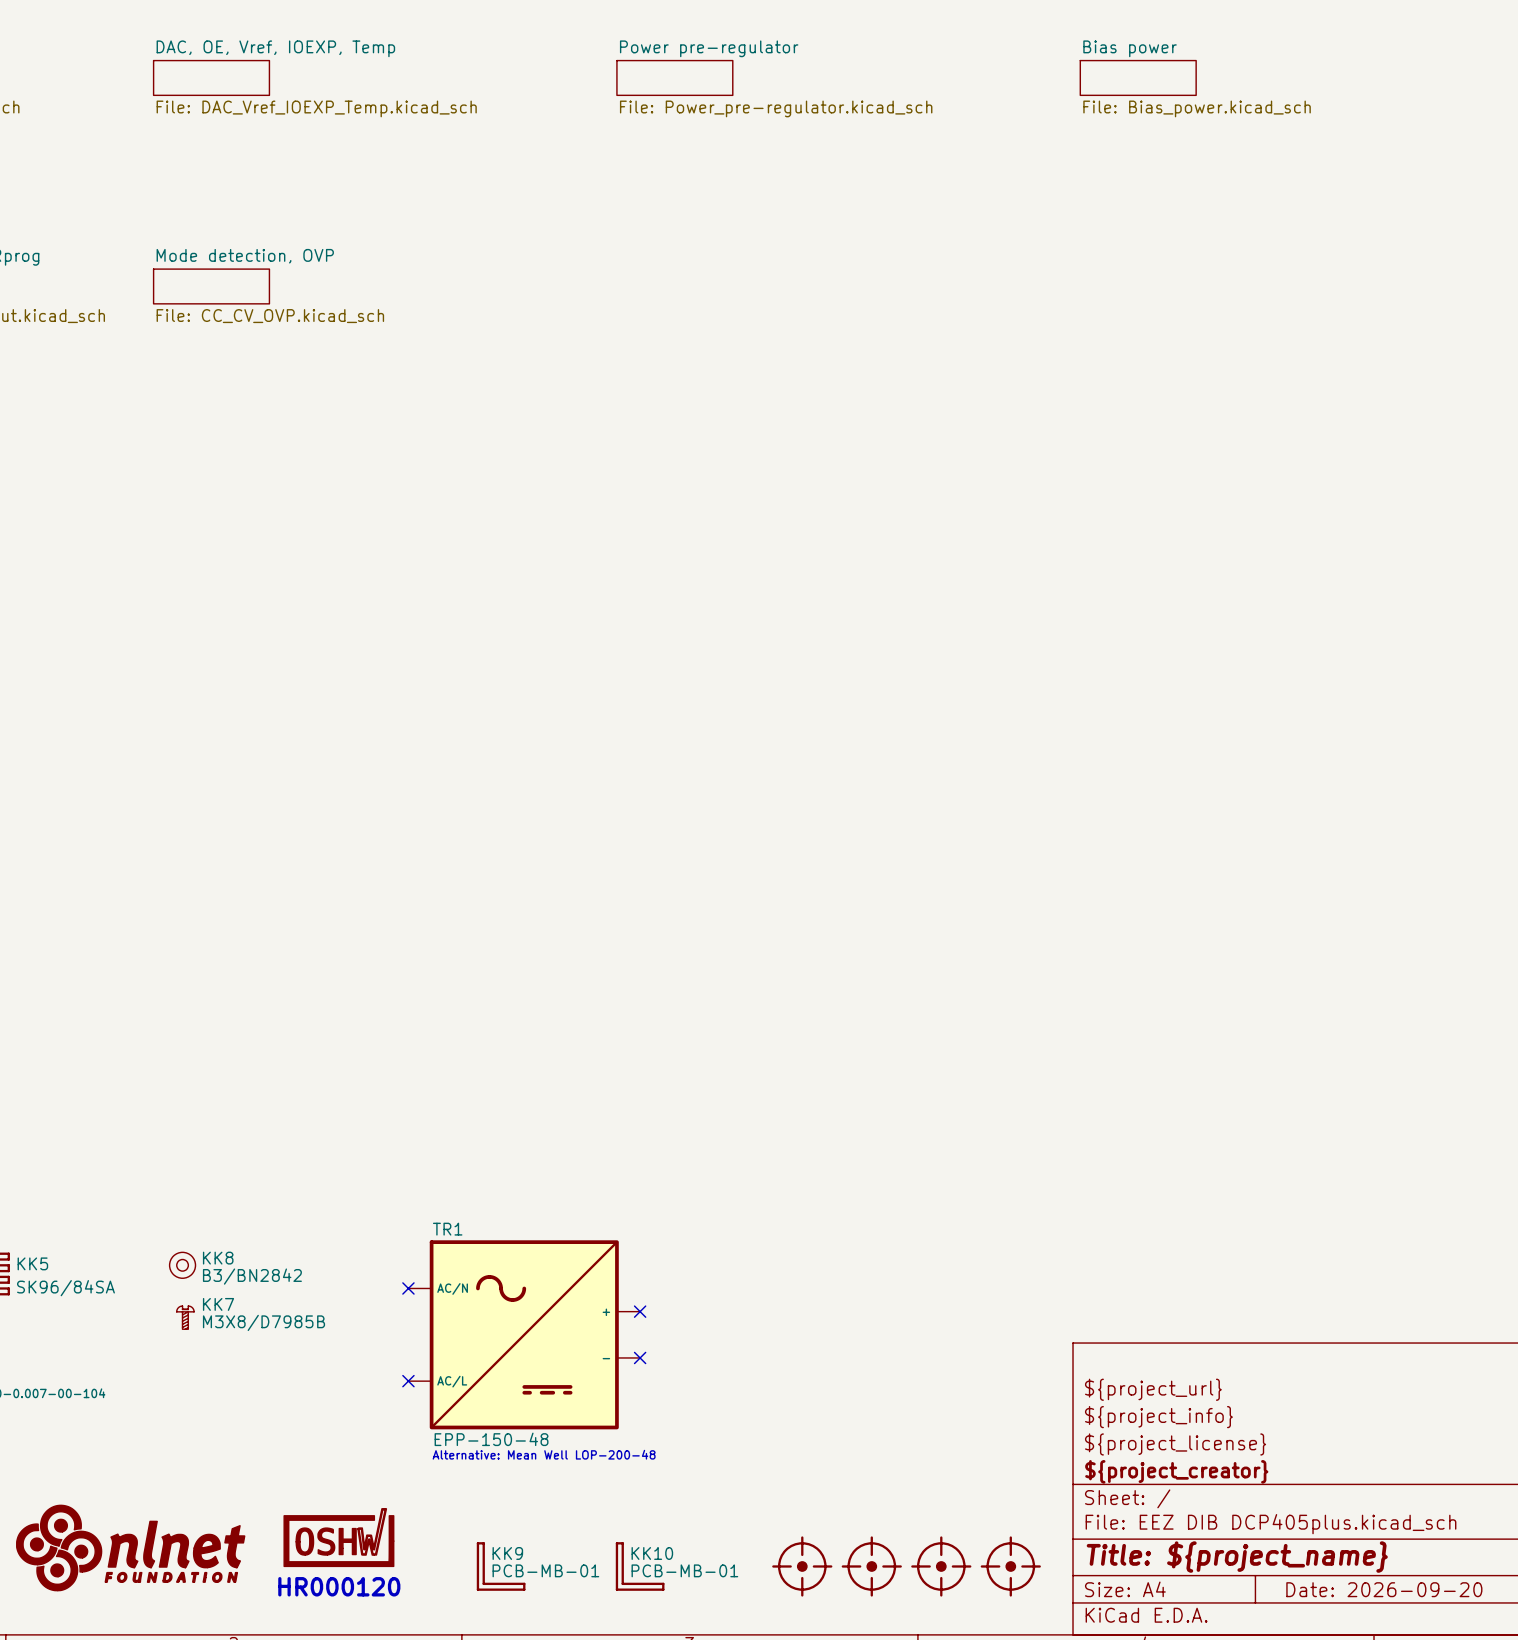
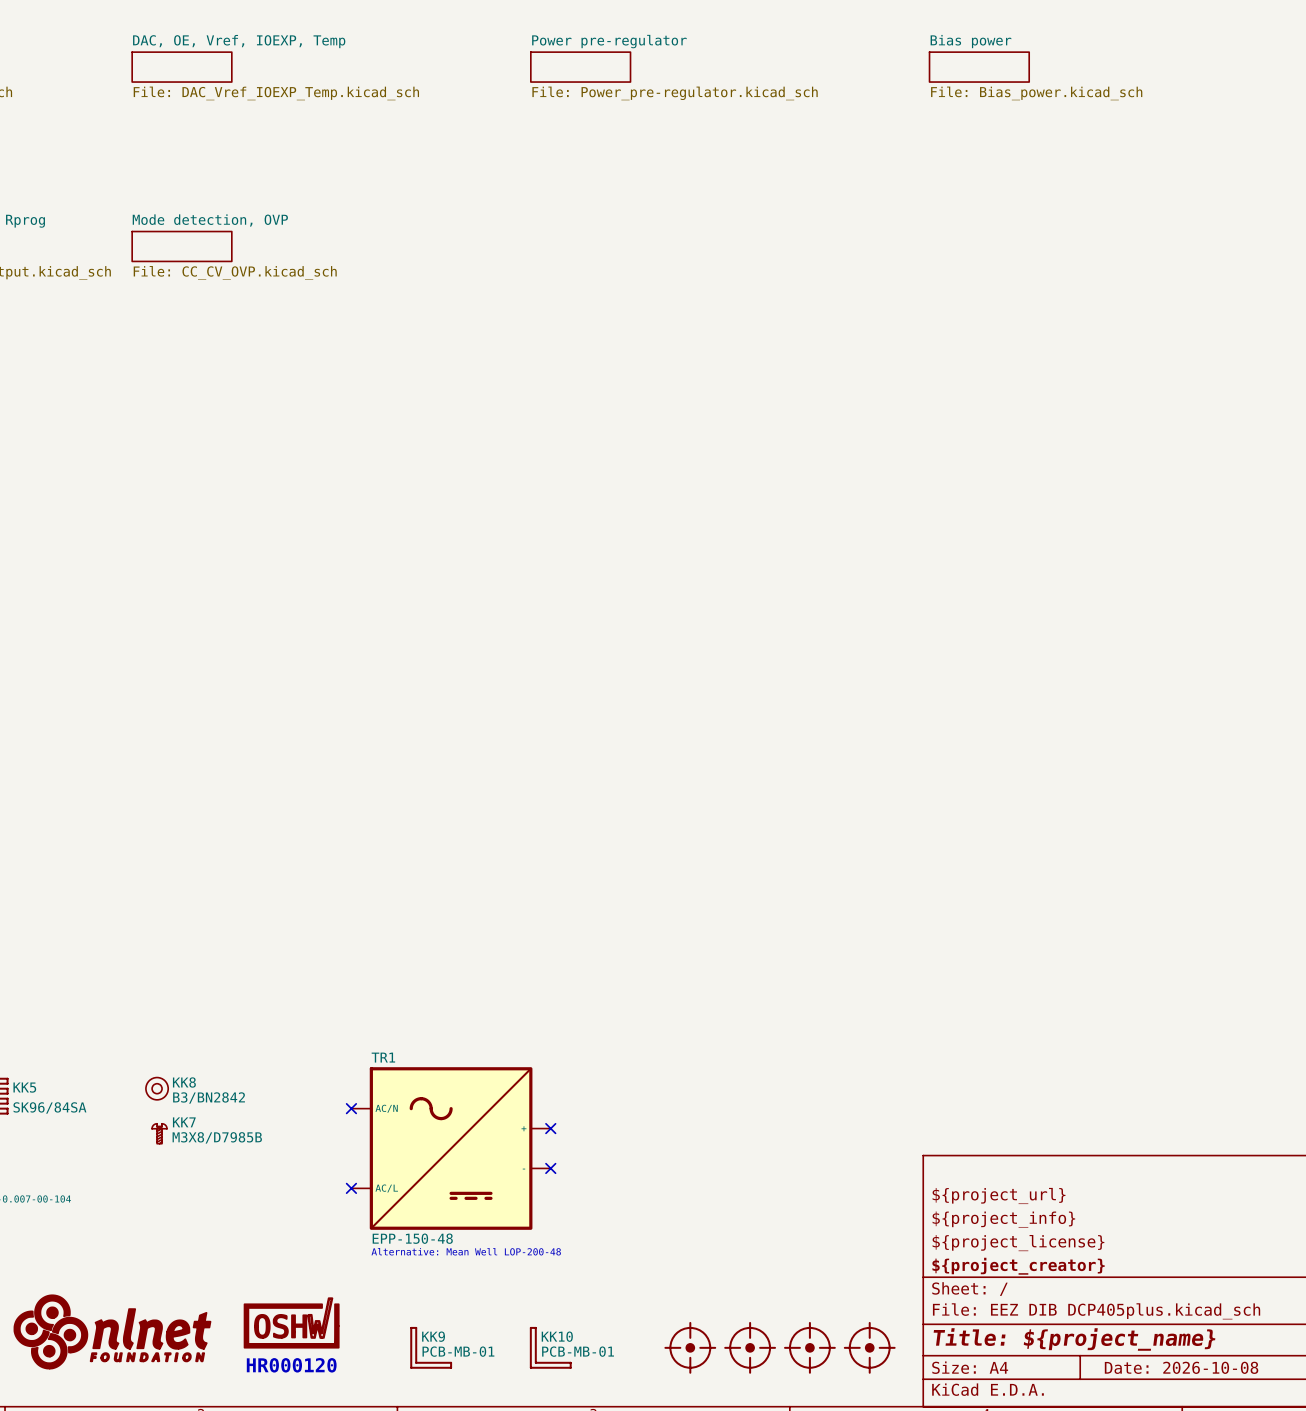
title block: Date: 2026-09-20 (1384, 1589) -> Date: 2026-10-08 (1181, 1367)

